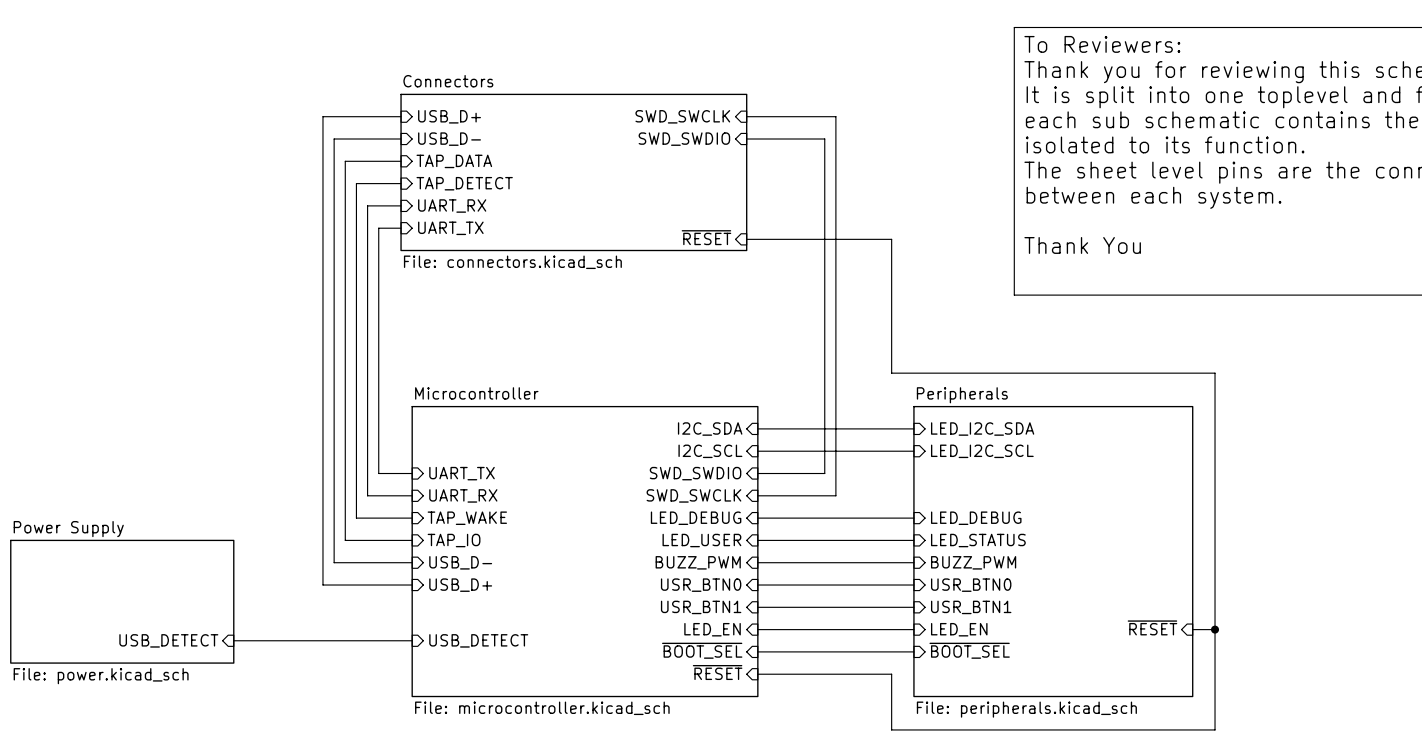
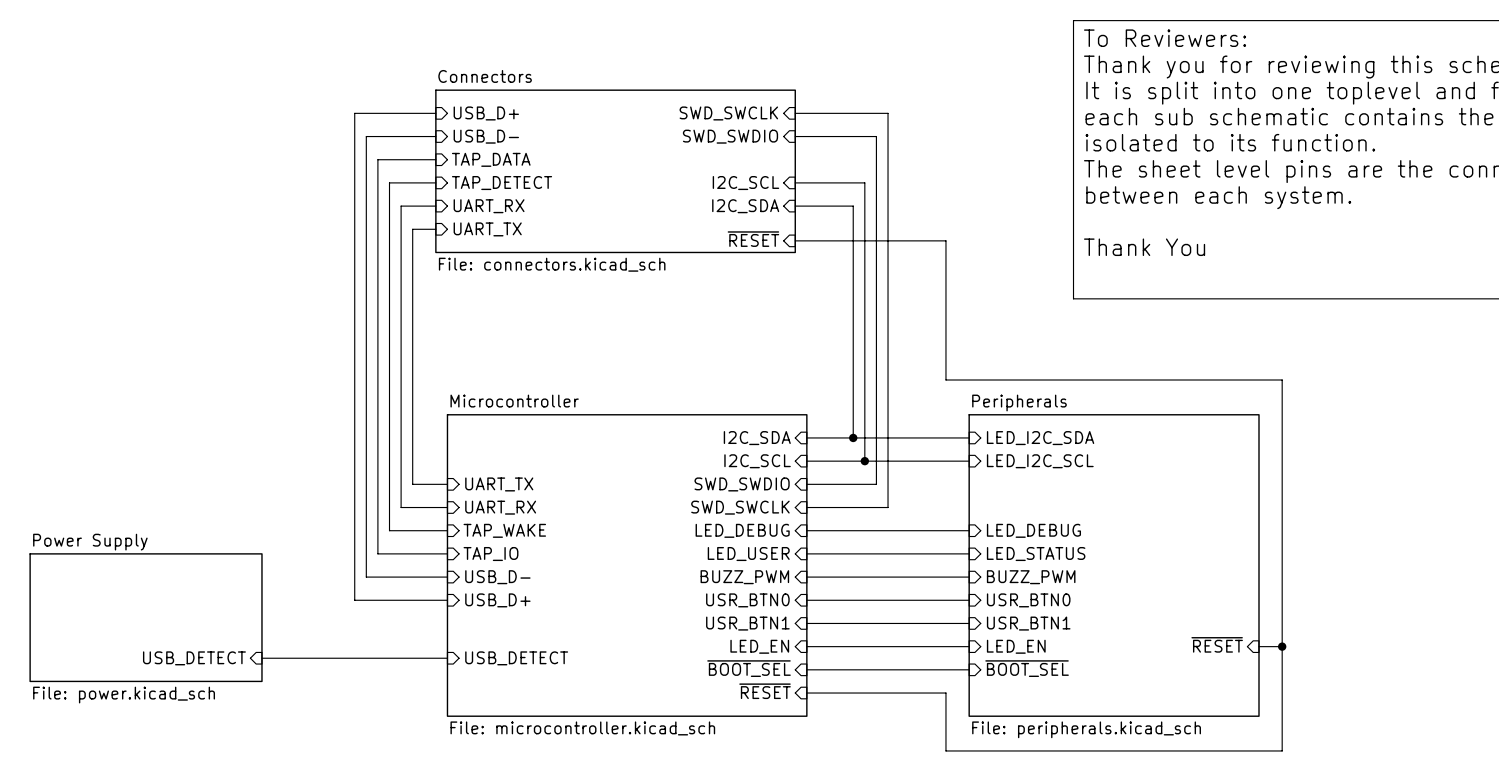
sheet pin: none -> I2C_SCL (745, 183)
wire: none -> (795, 182) (864, 182) (864, 461)
wire: none -> (795, 206) (853, 206) (853, 437)
sheet pin: none -> I2C_SDA (745, 206)
junction: none -> (853, 437)
junction: none -> (864, 461)

